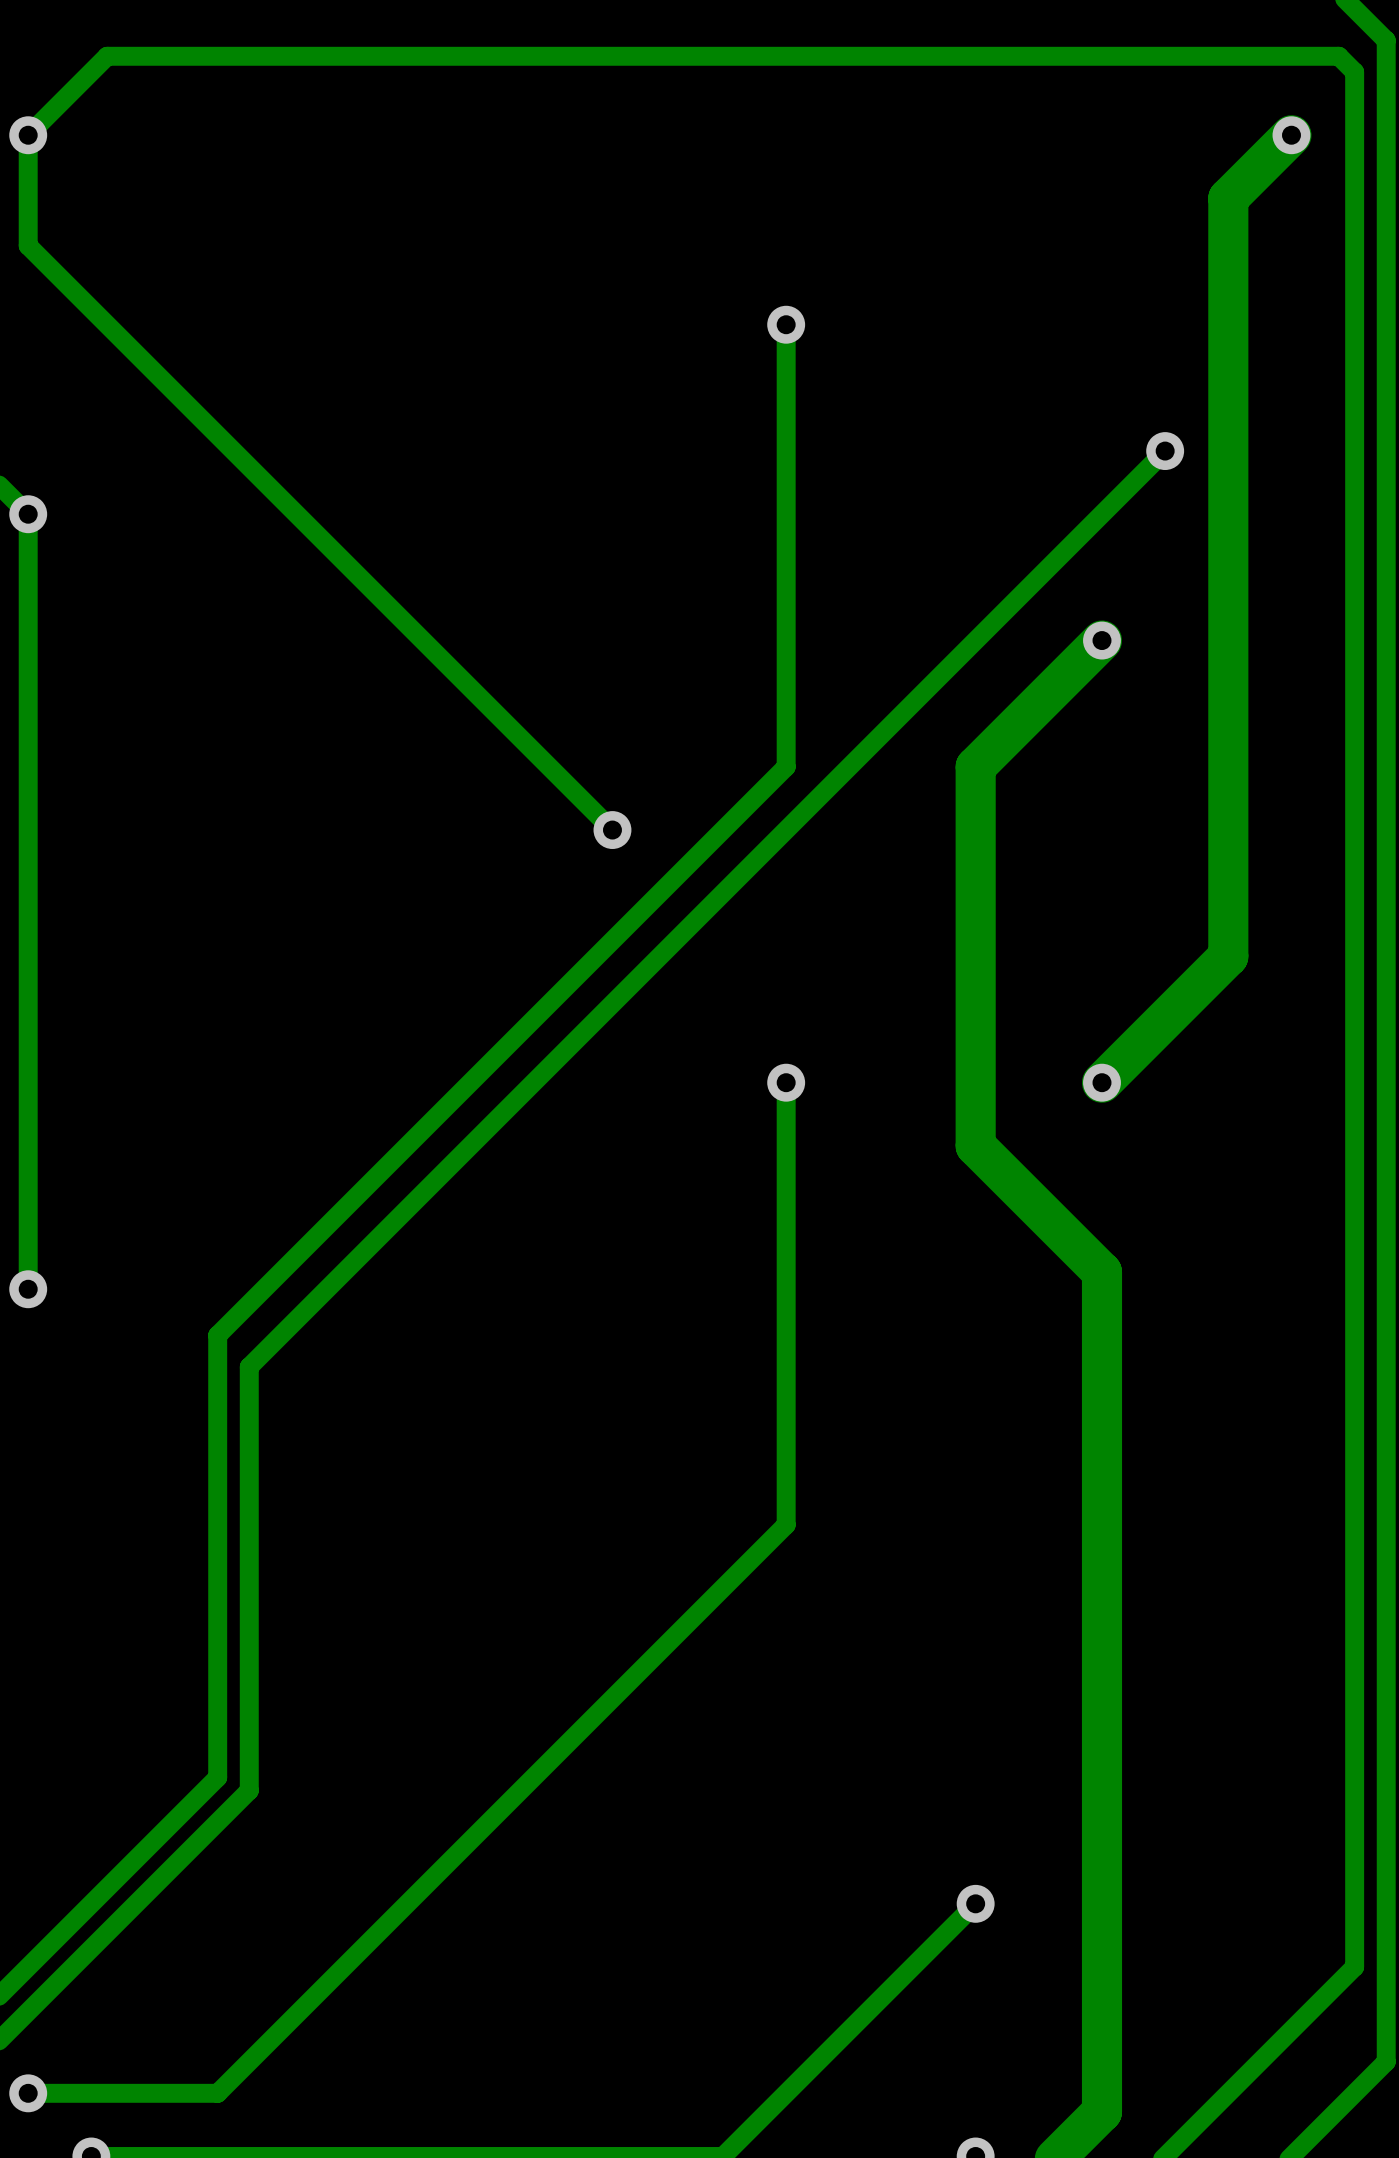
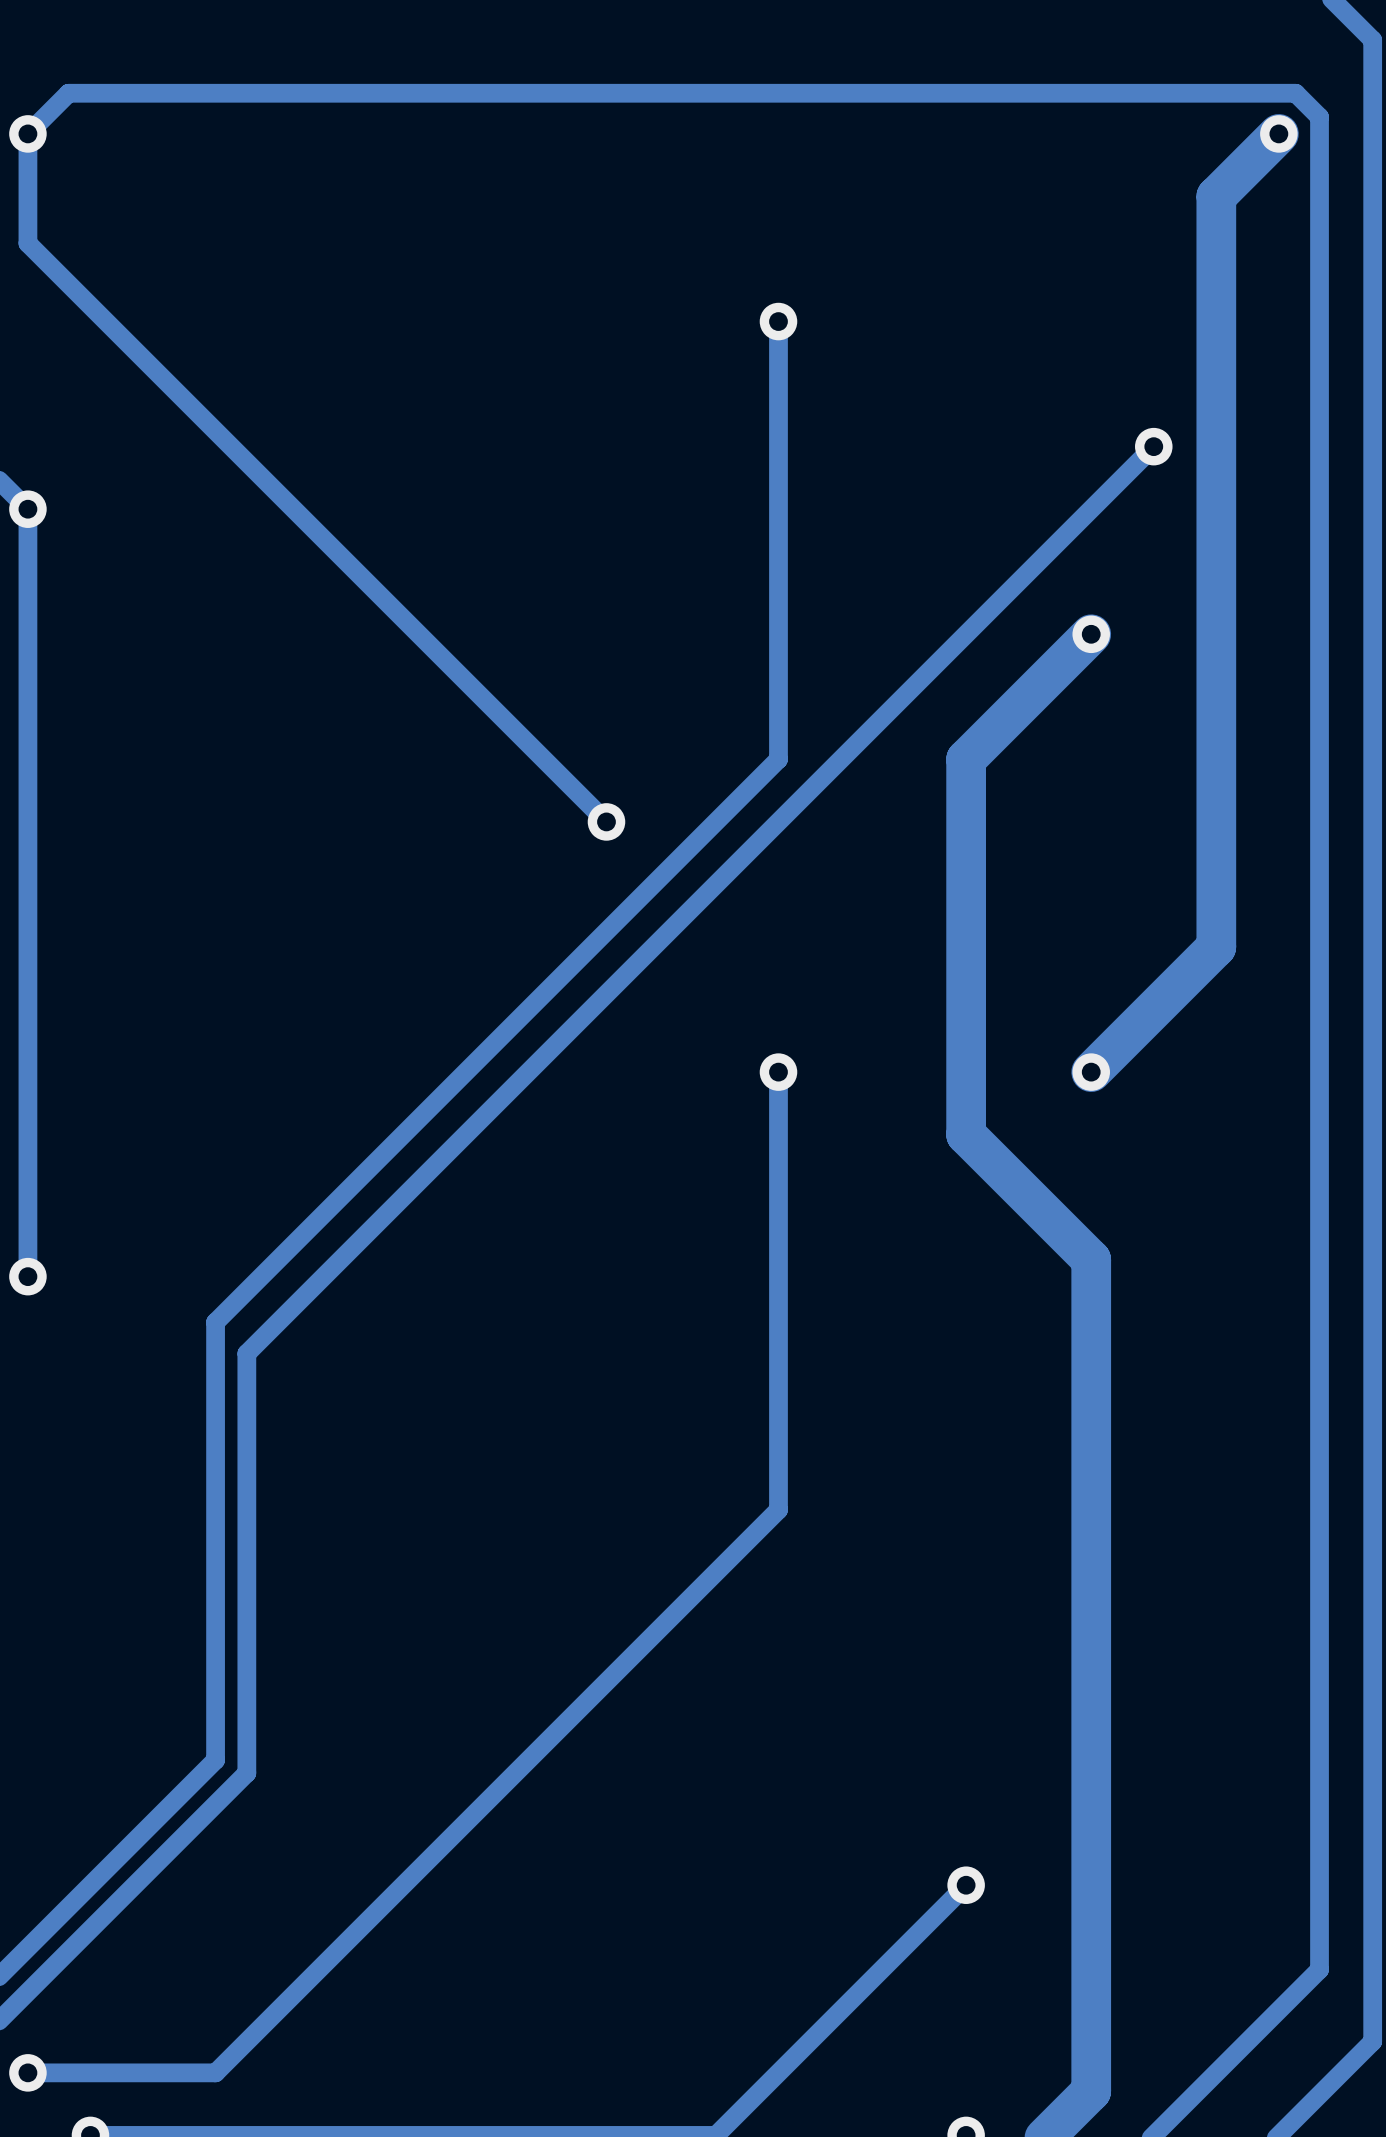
track: (69, 94) (107, 56) (1338, 56) (1354, 72) (1354, 1966) (1332, 1989) -> (68, 93) (1295, 93) (1319, 117) (1319, 1969)

